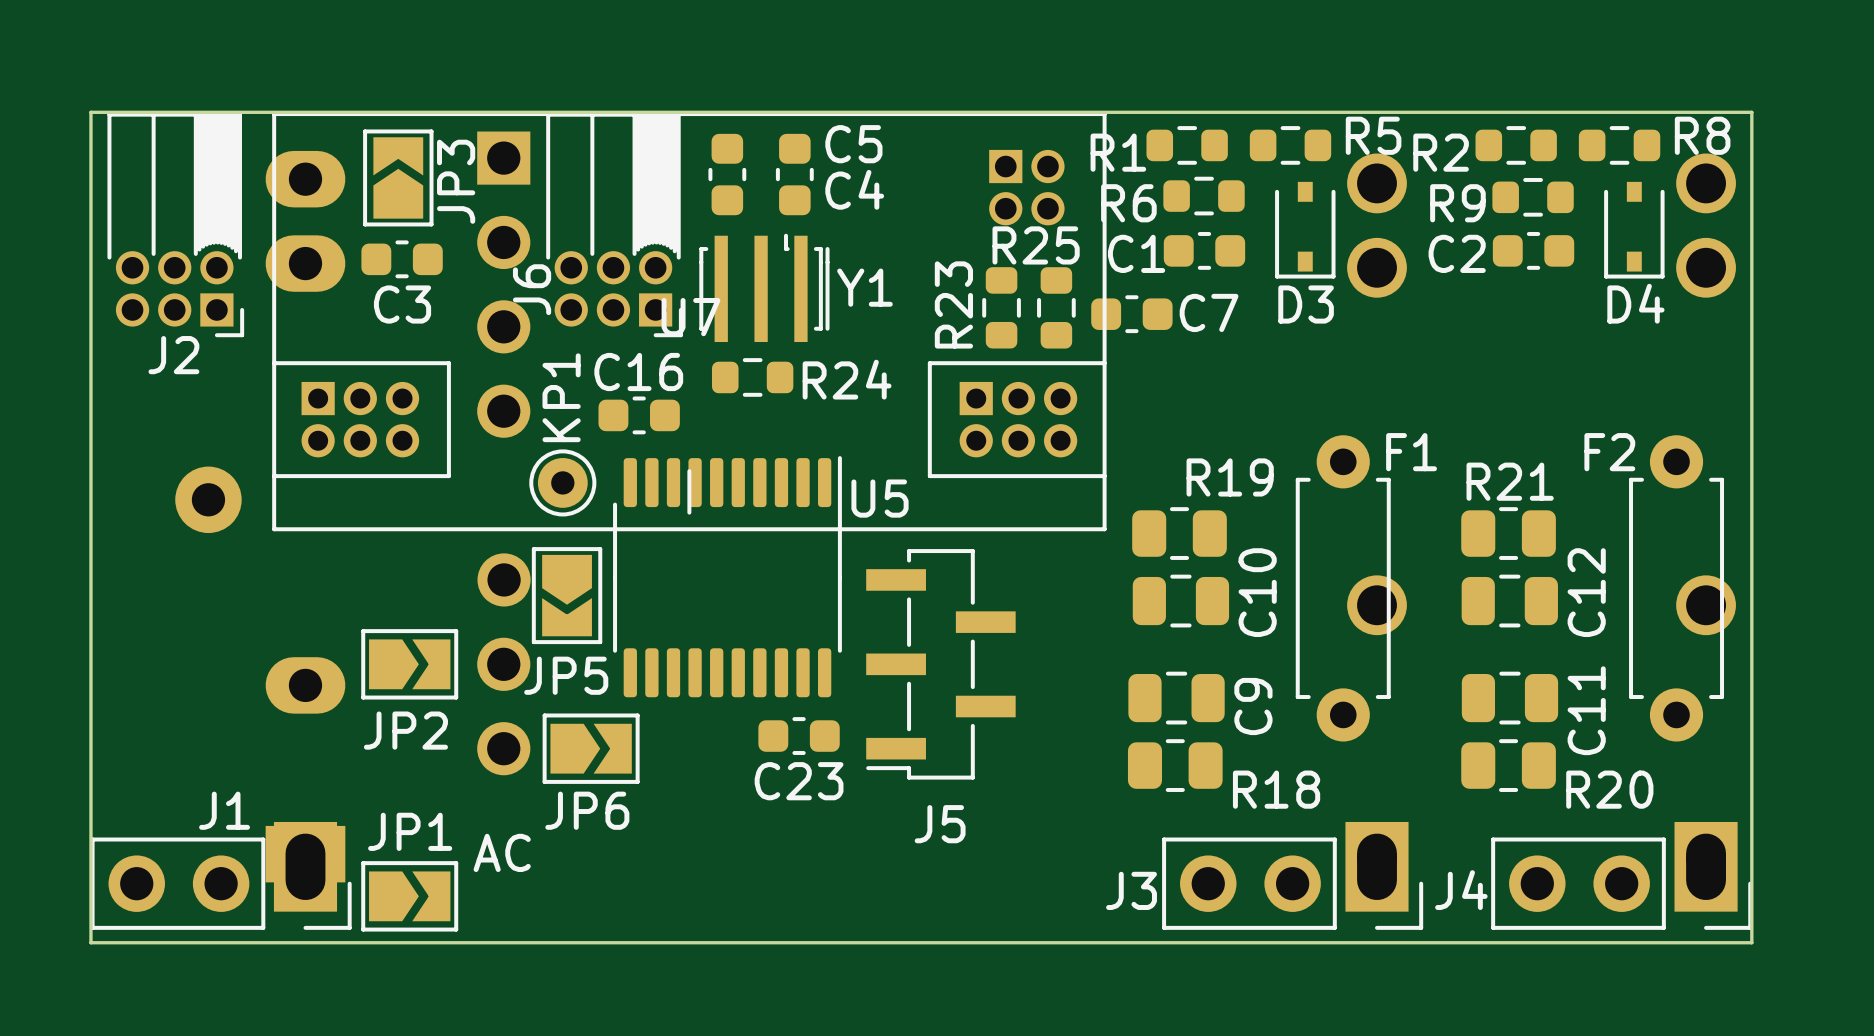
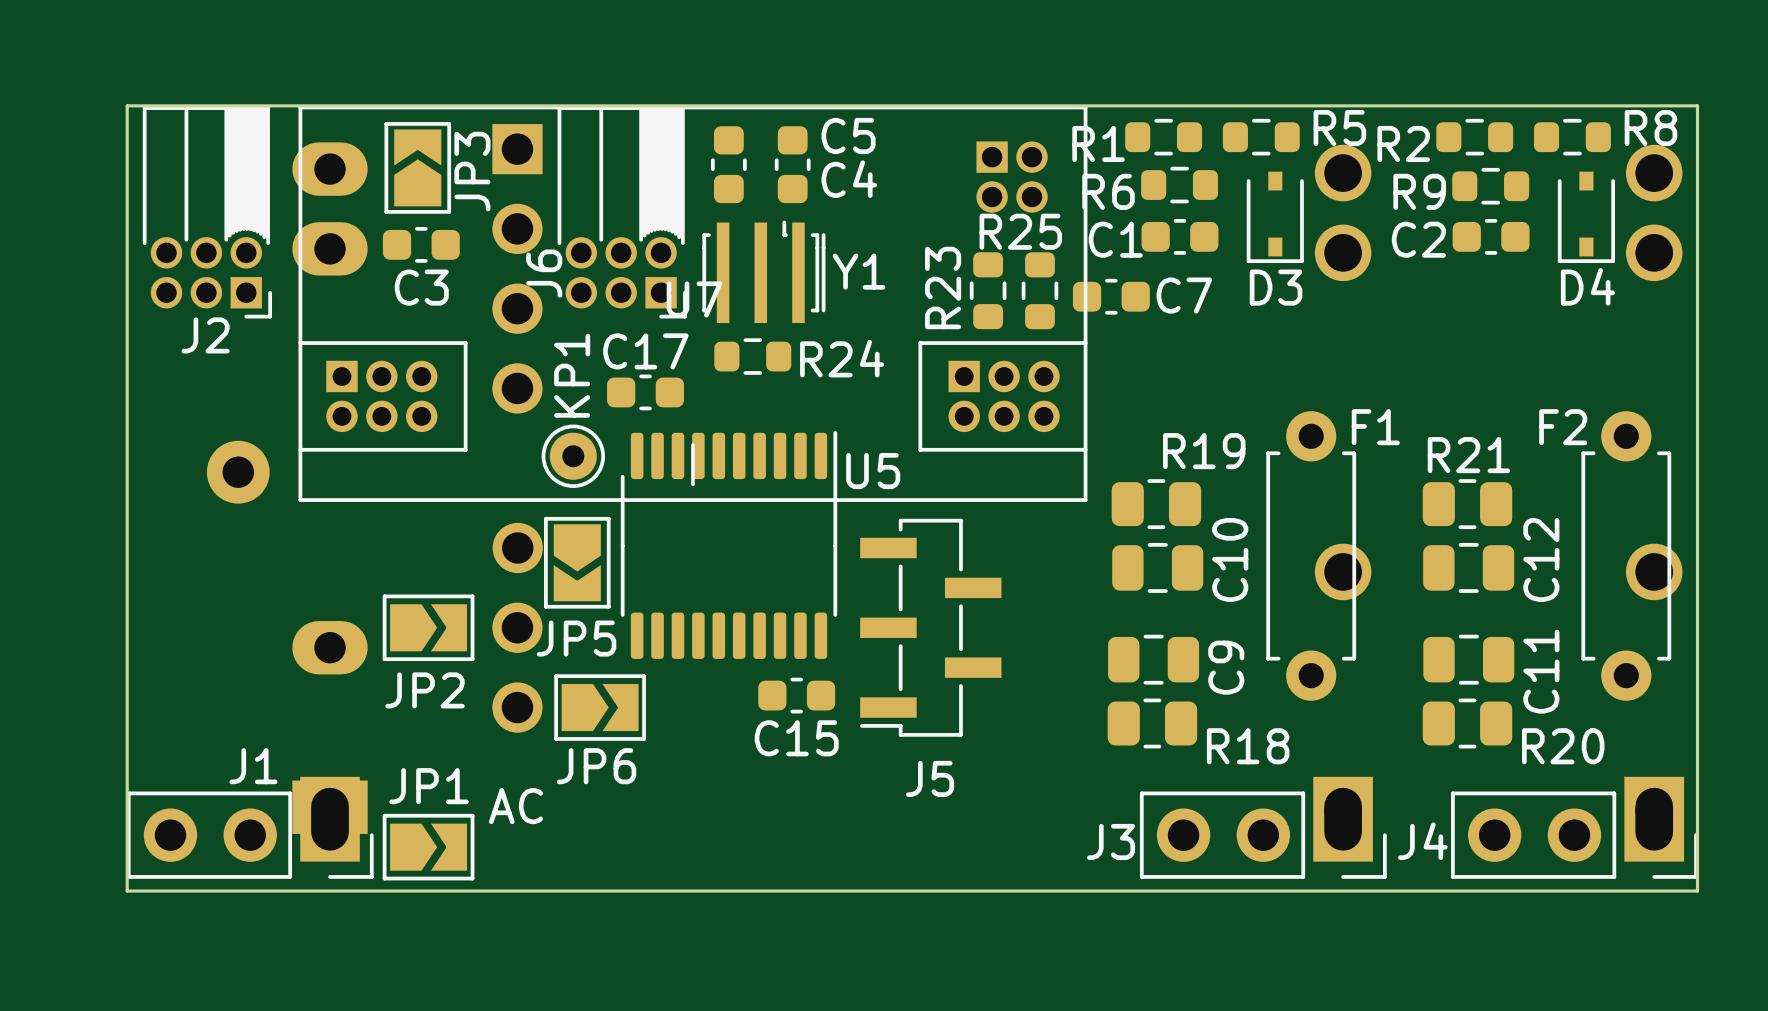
C16 name: C16 (638, 372) -> C17 (645, 351)
C23 name: C23 (799, 781) -> C15 (796, 738)

